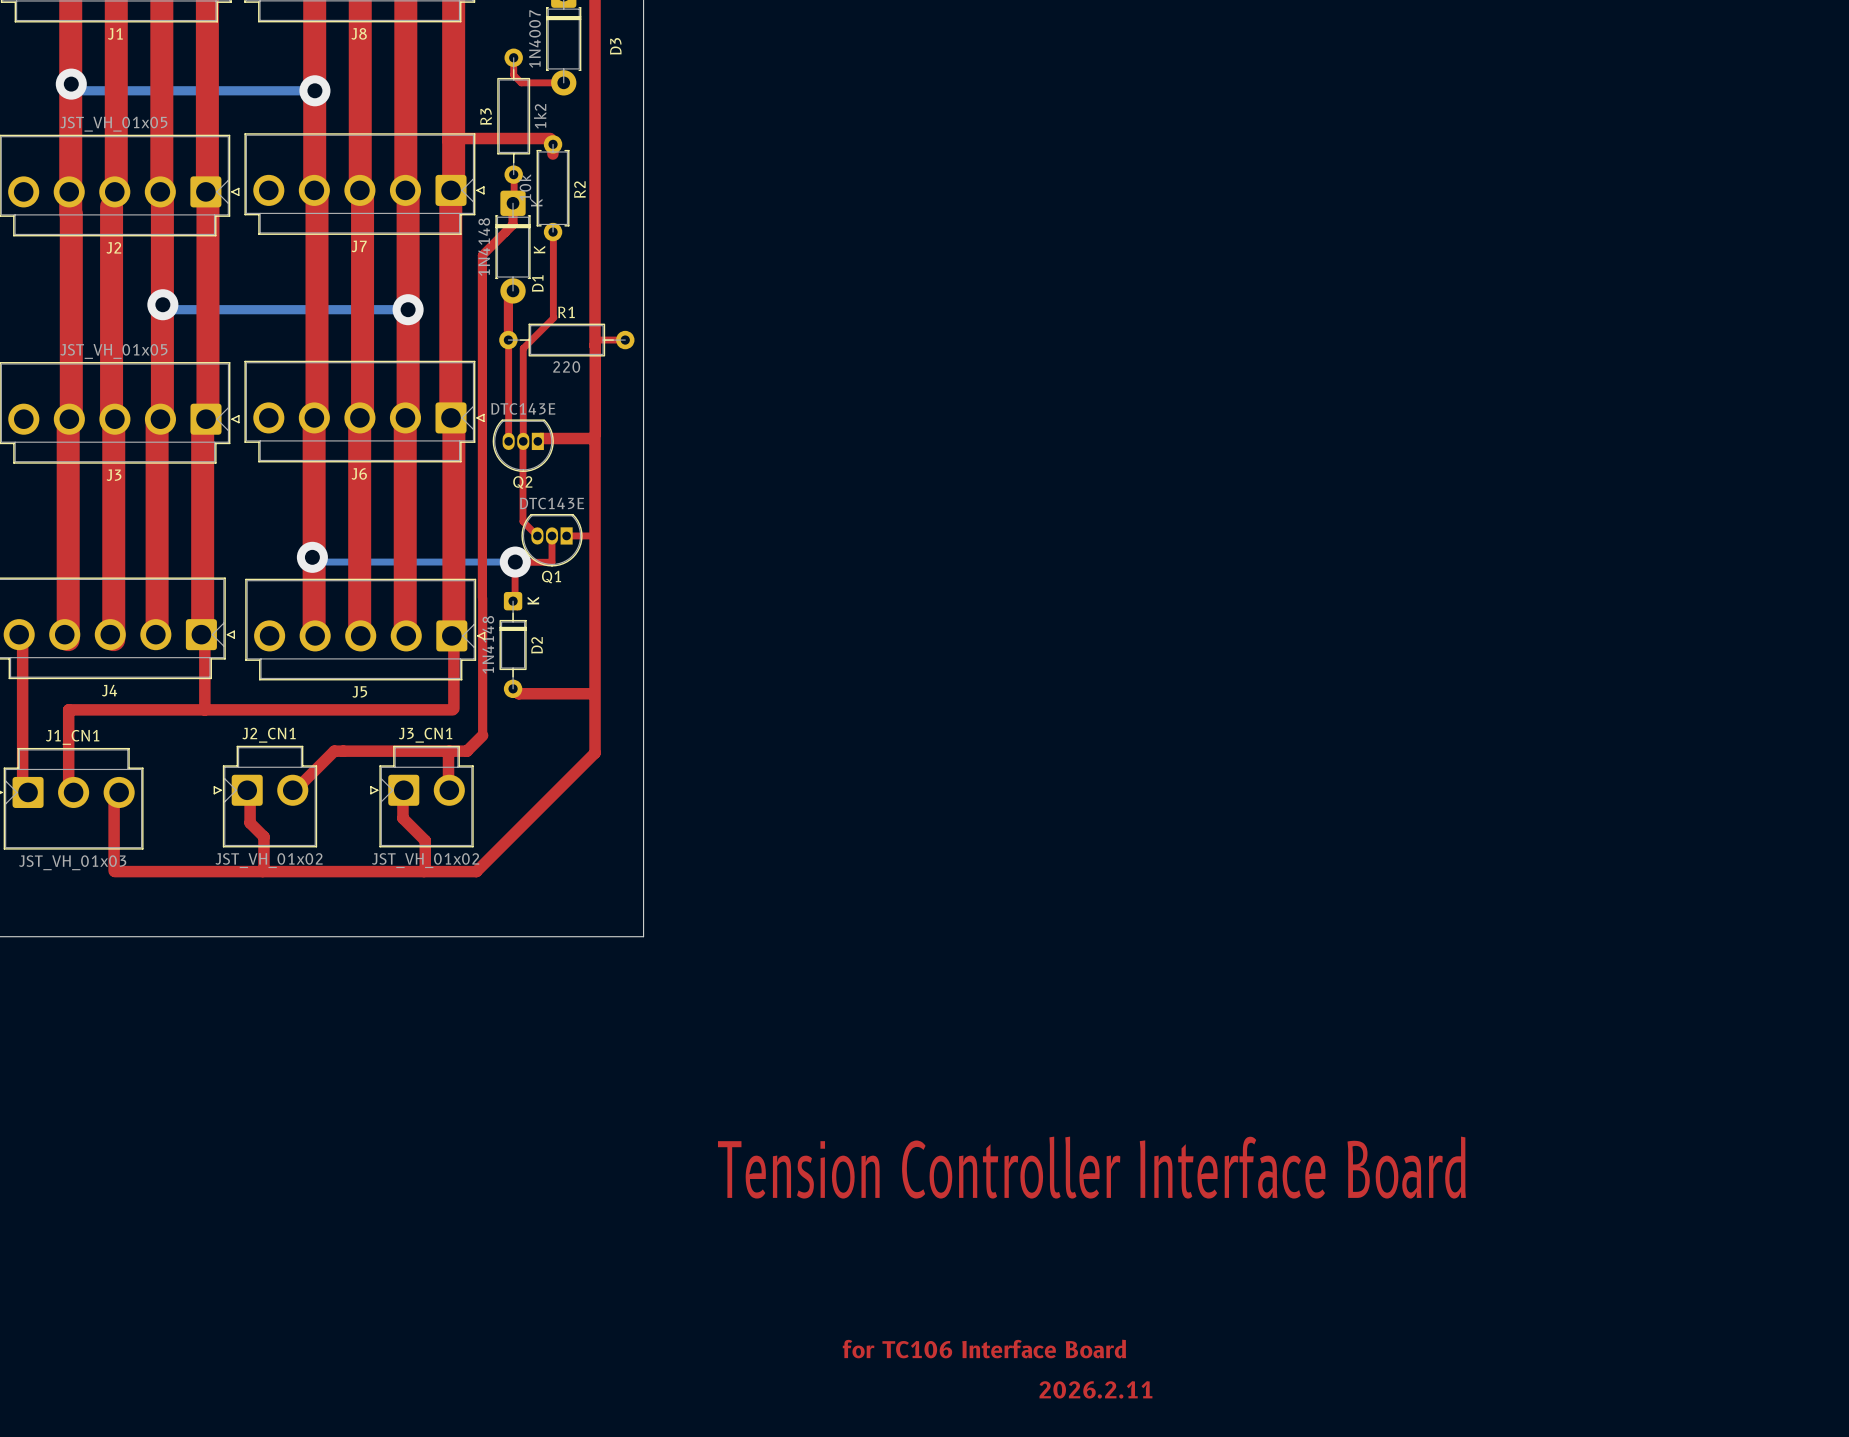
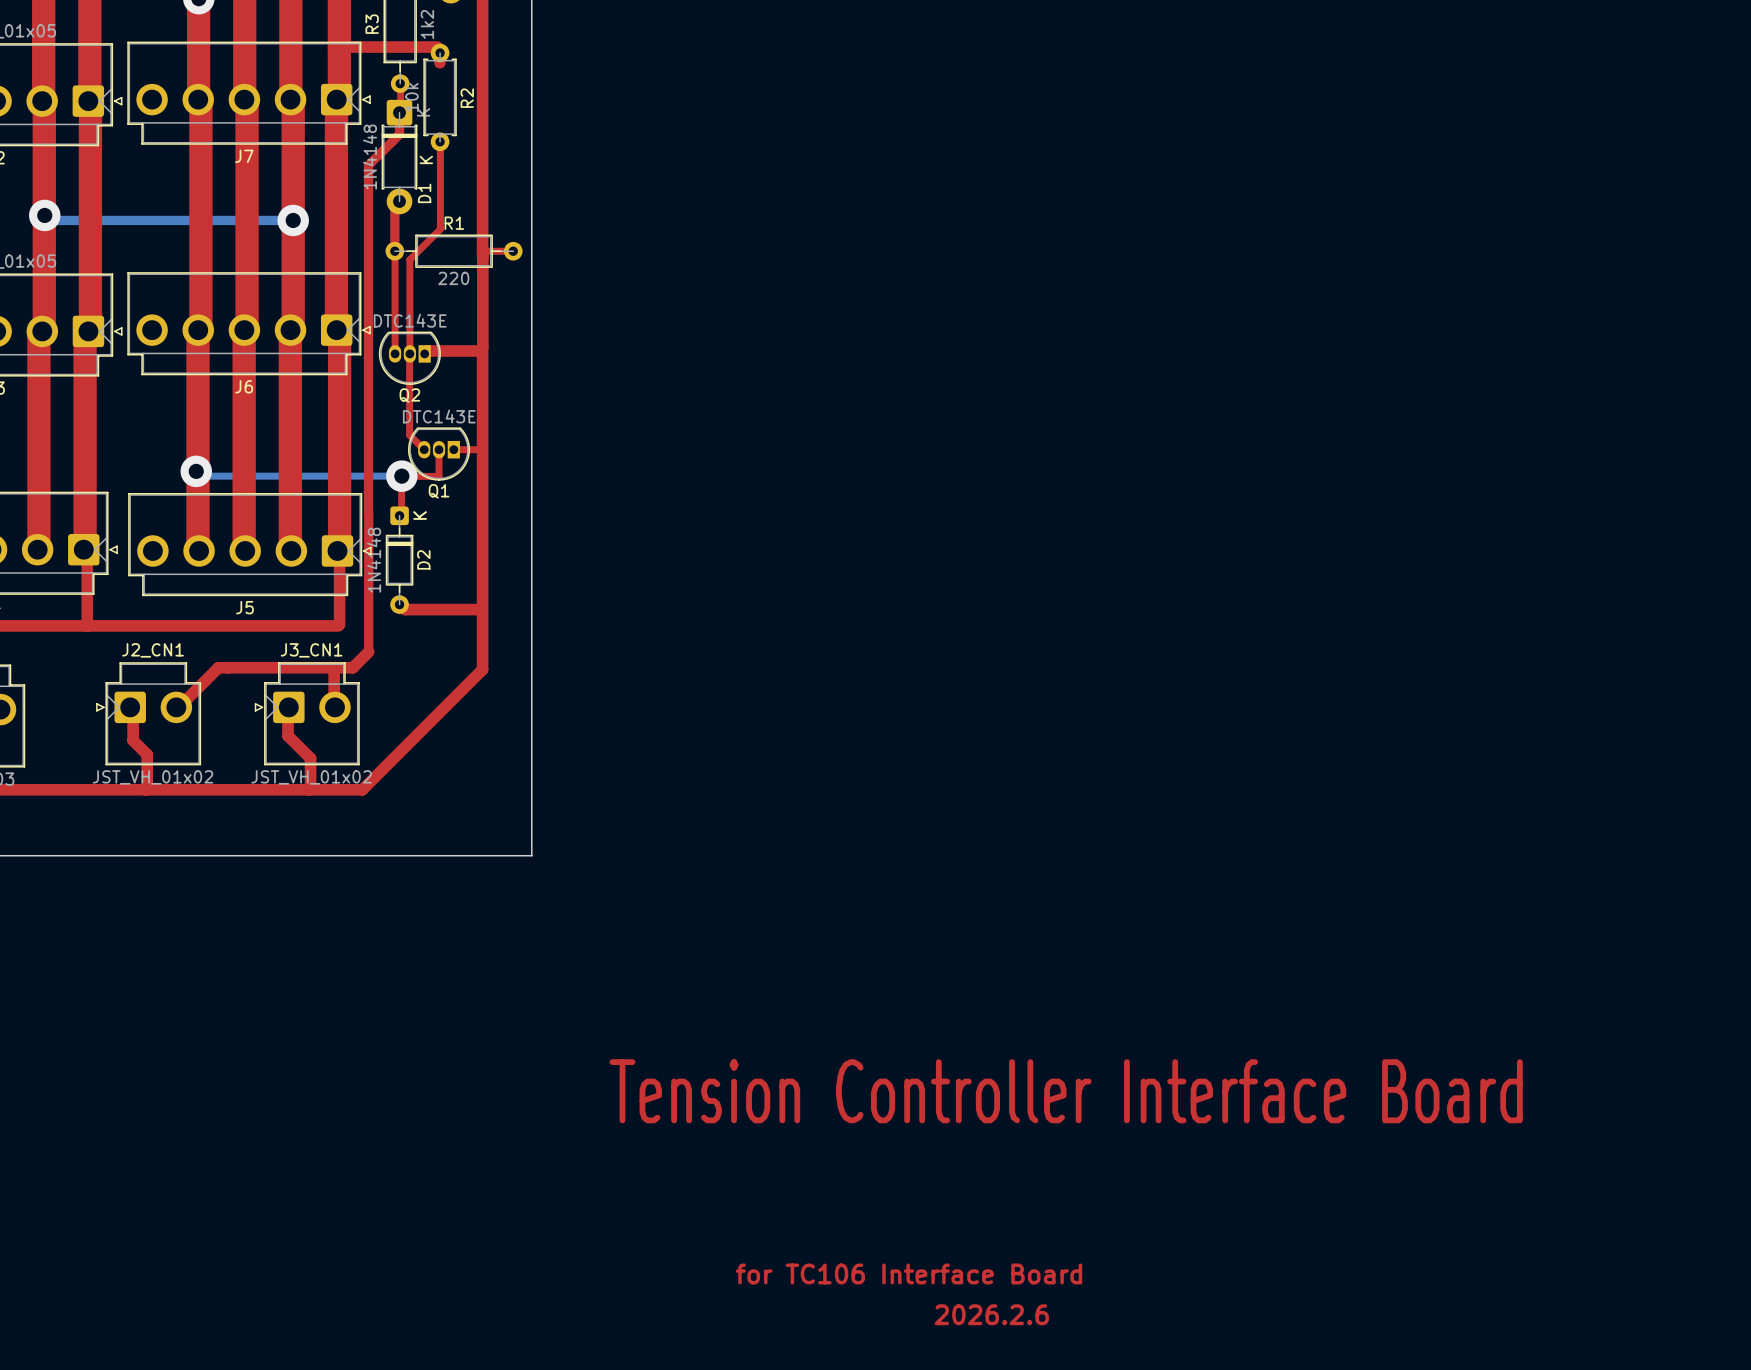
text: 2026.2.11 (1095, 1389) -> 2026.2.6 (991, 1314)

